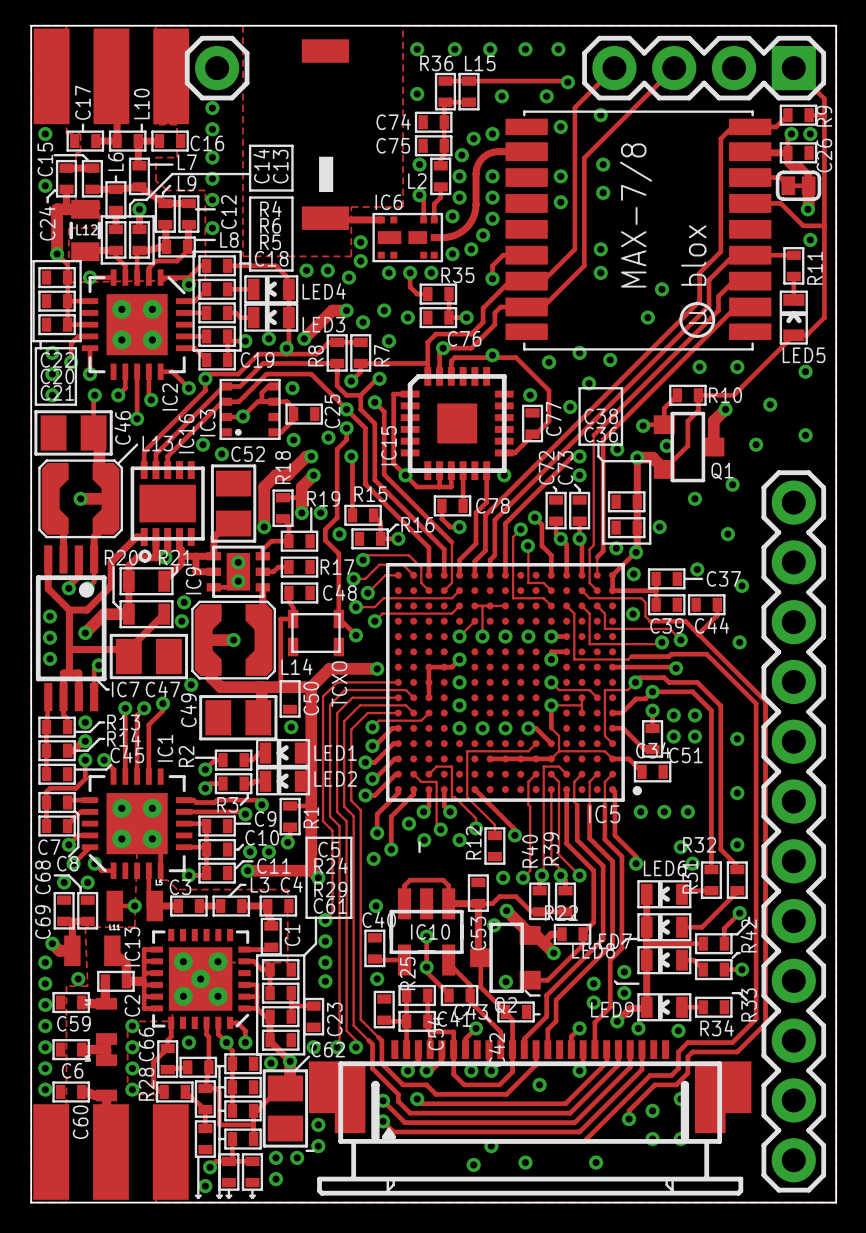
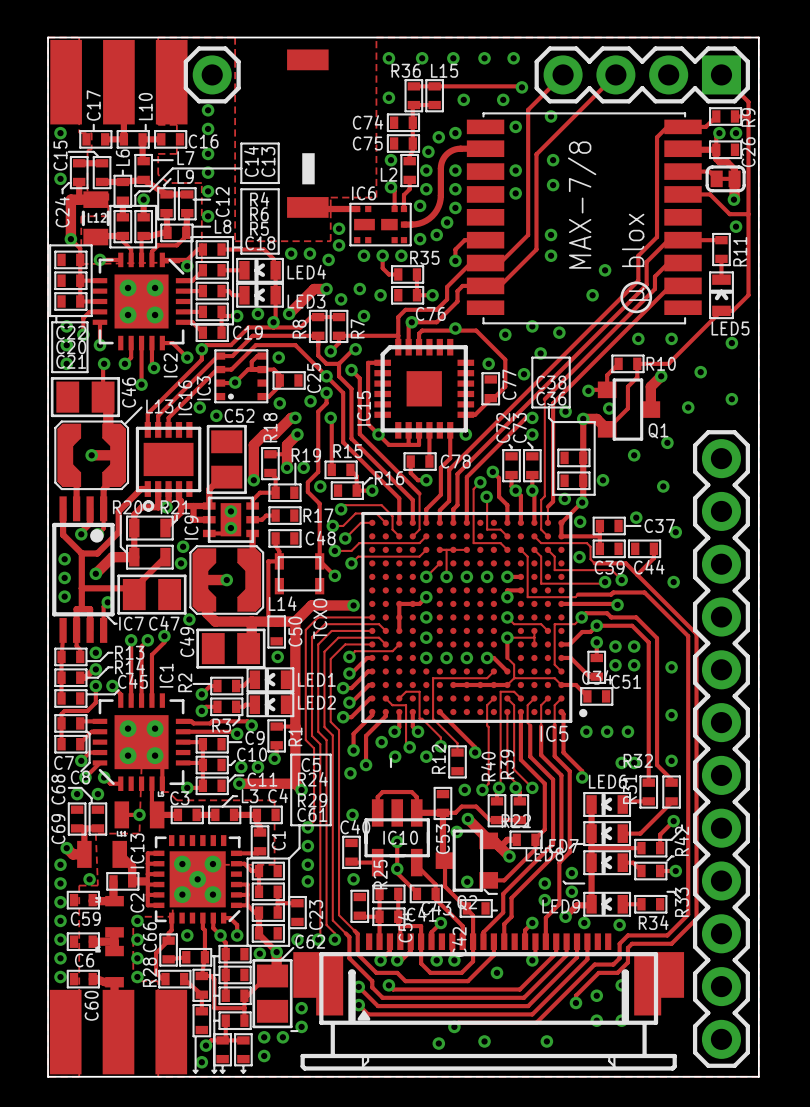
via position: (692, 863) -> (634, 762)

